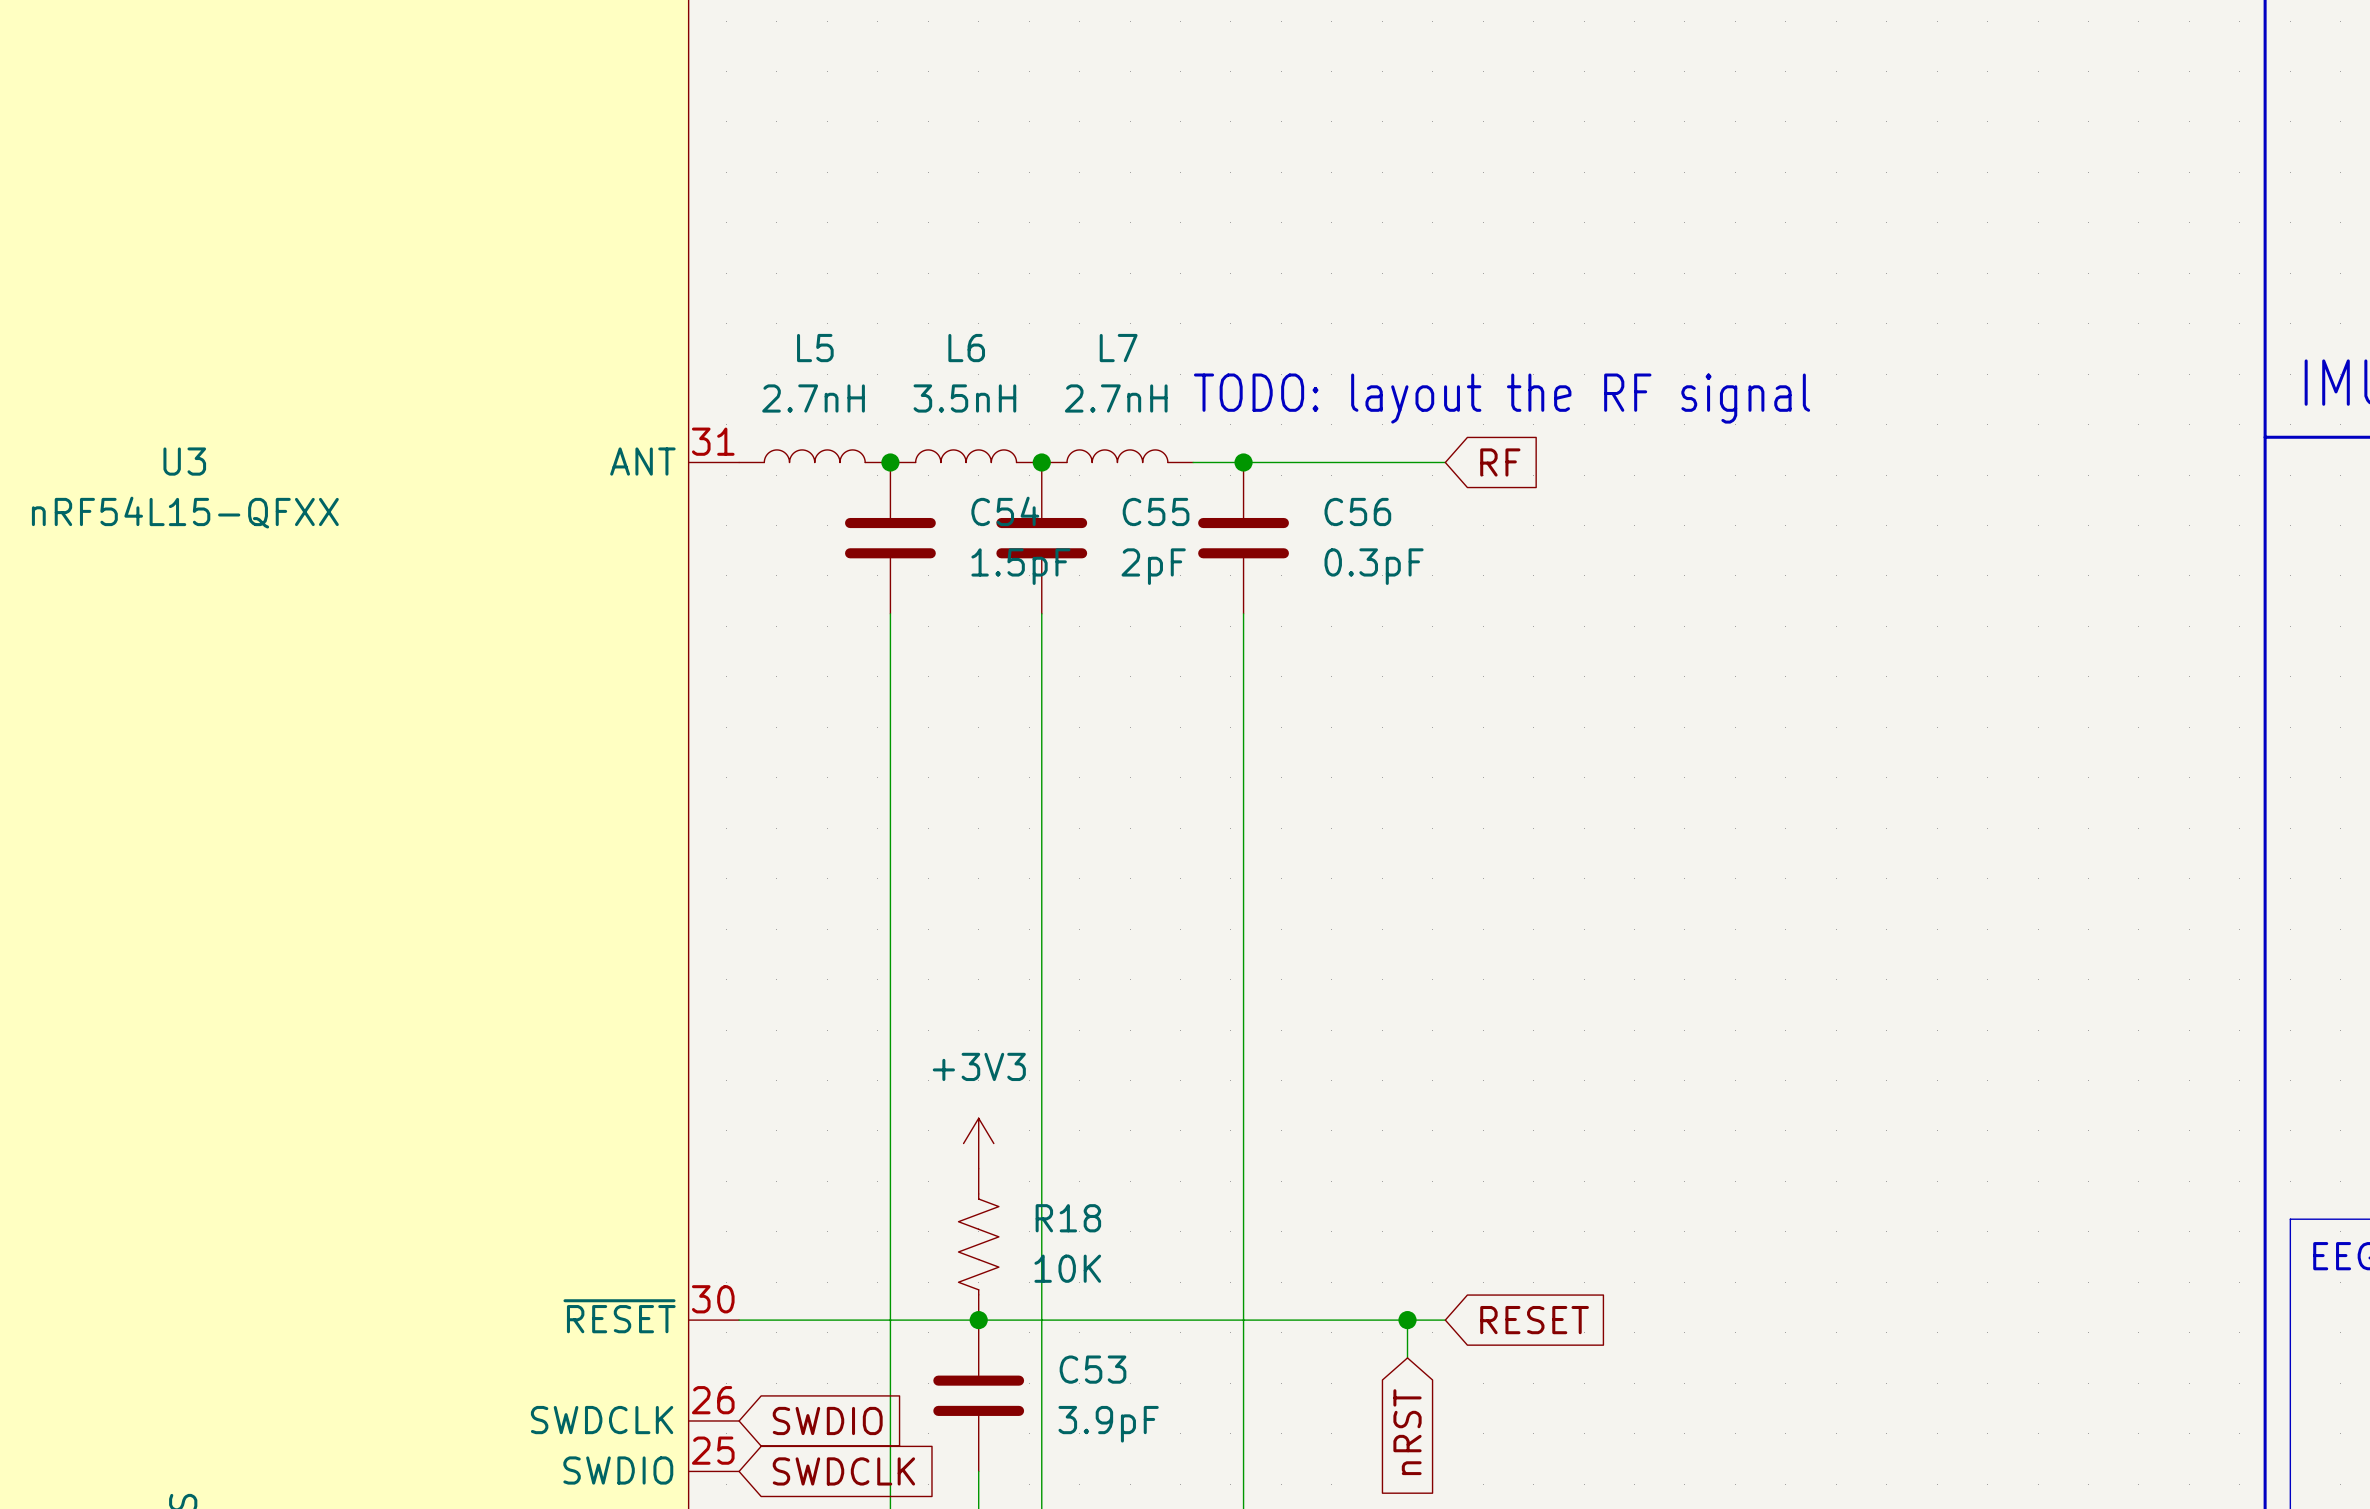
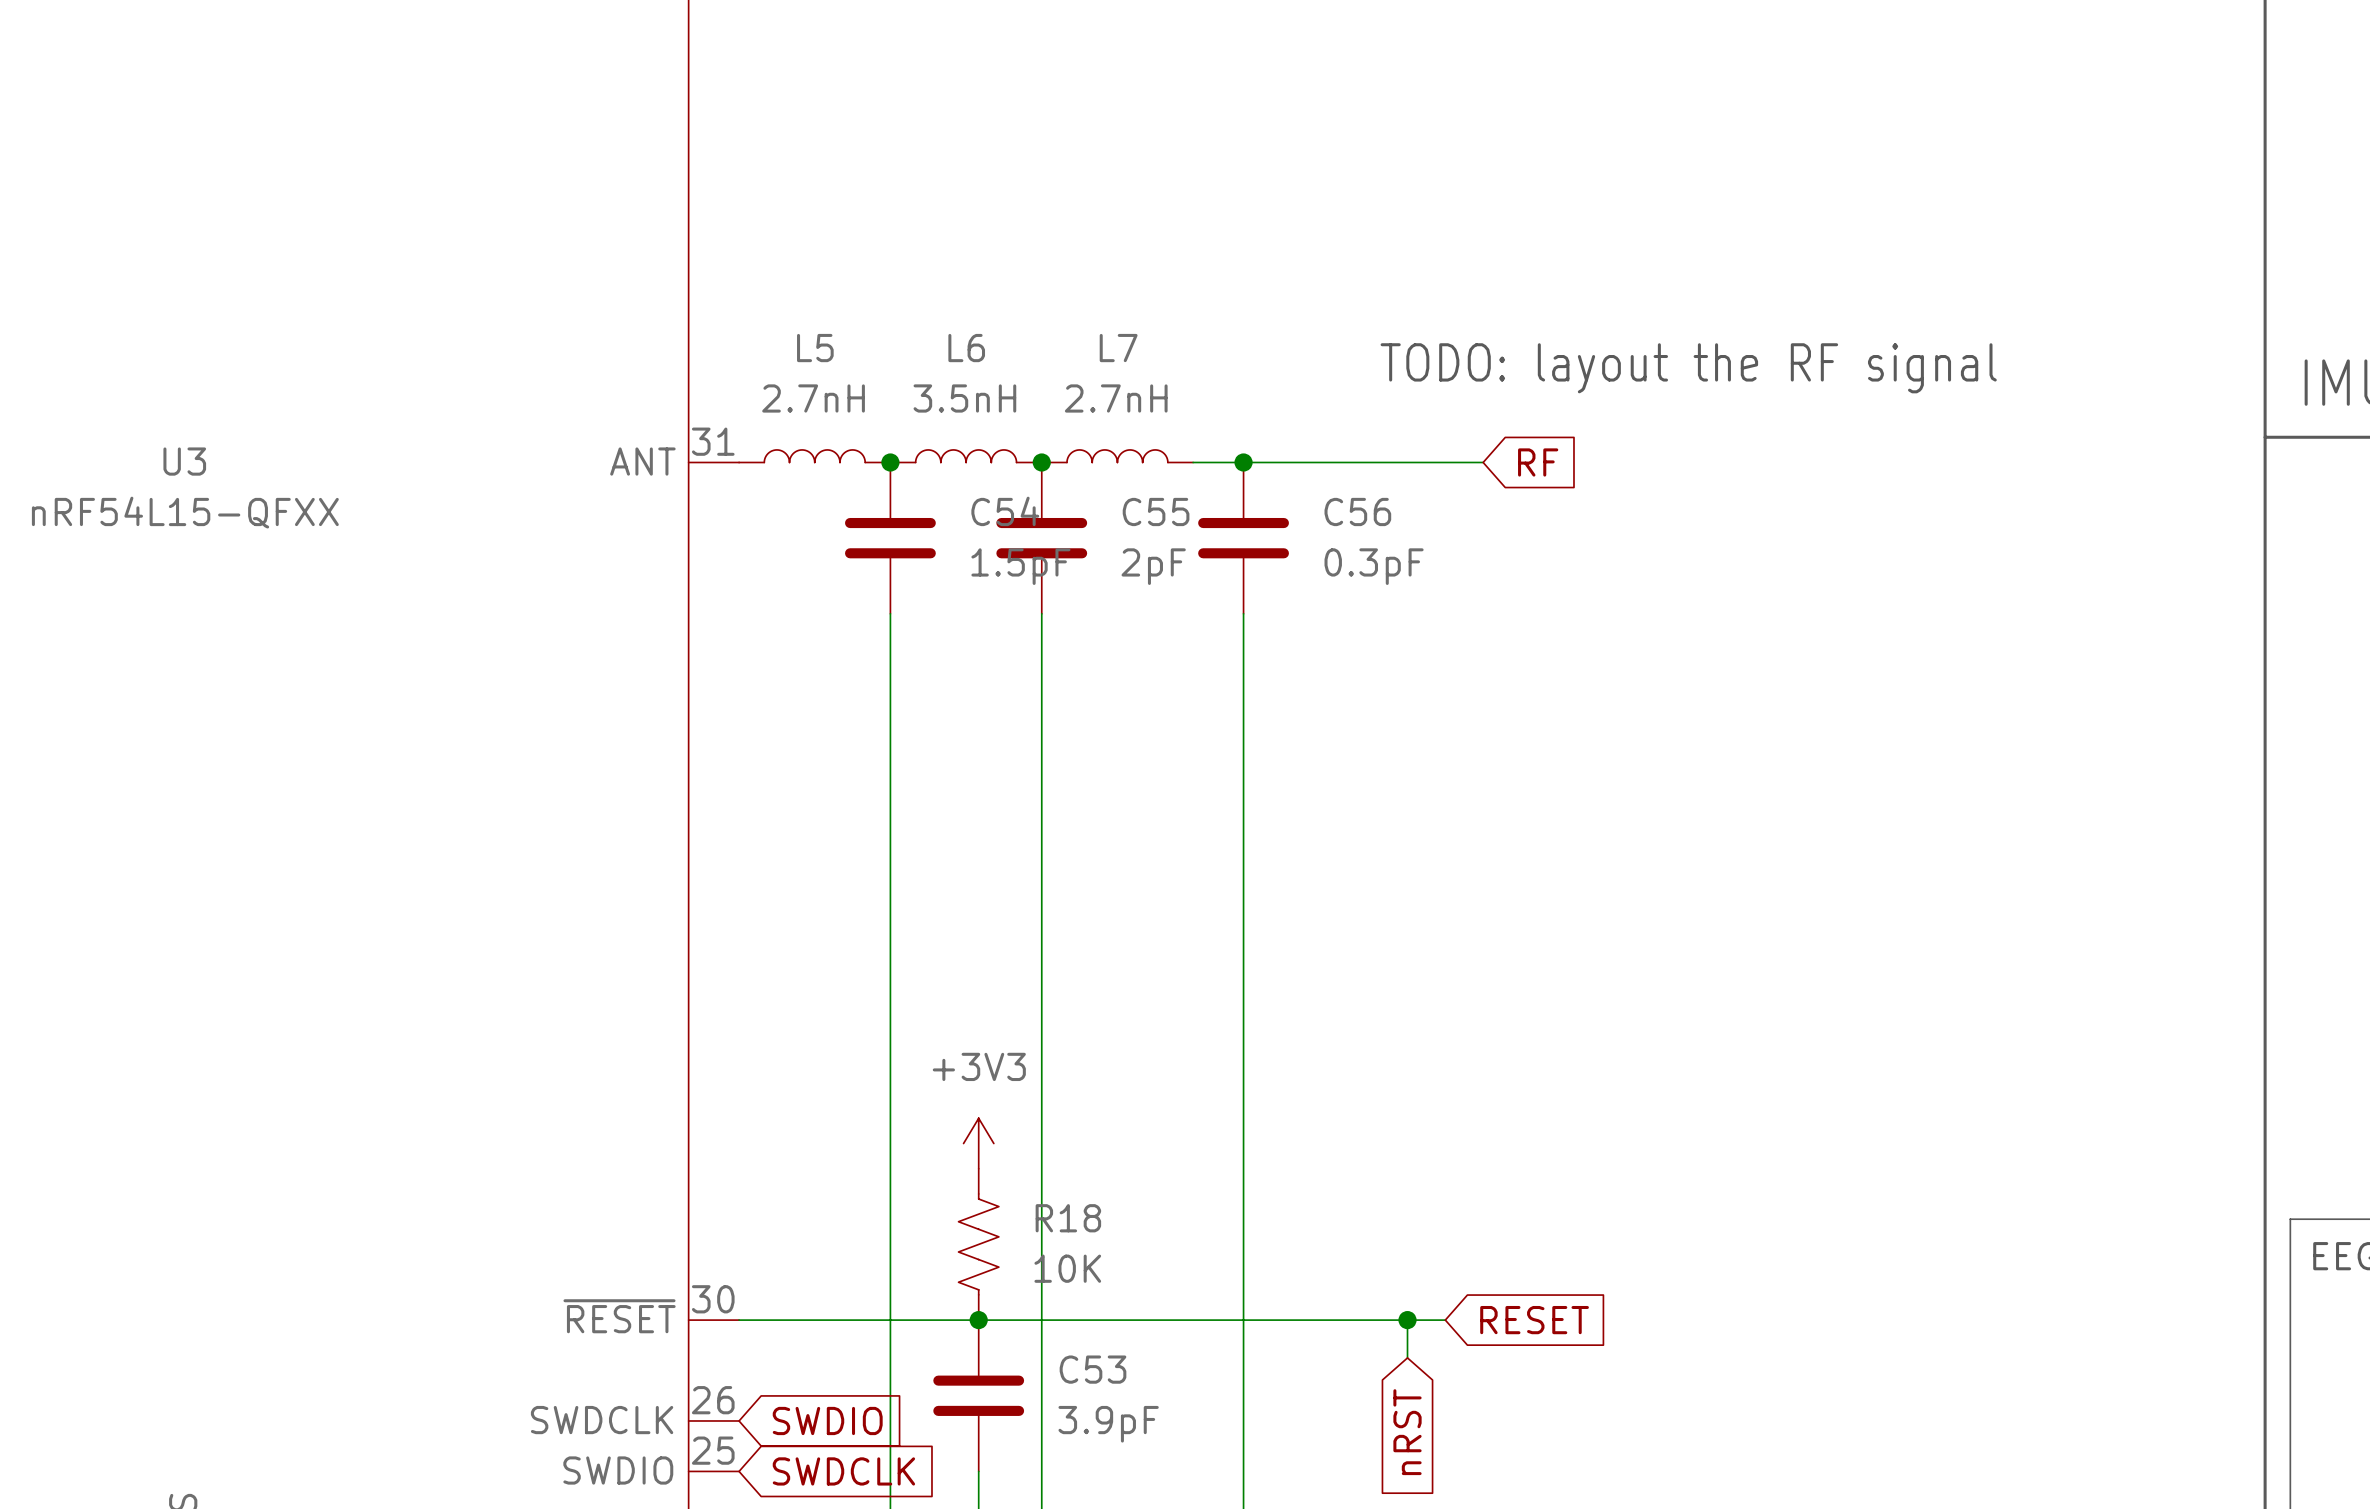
text position: TODO: layout the RF signal (1502, 398) -> TODO: layout the RF signal (1688, 368)
wire: none -> (1445, 462) (1483, 462)
global label position: RF (1500, 462) -> RF (1538, 462)

